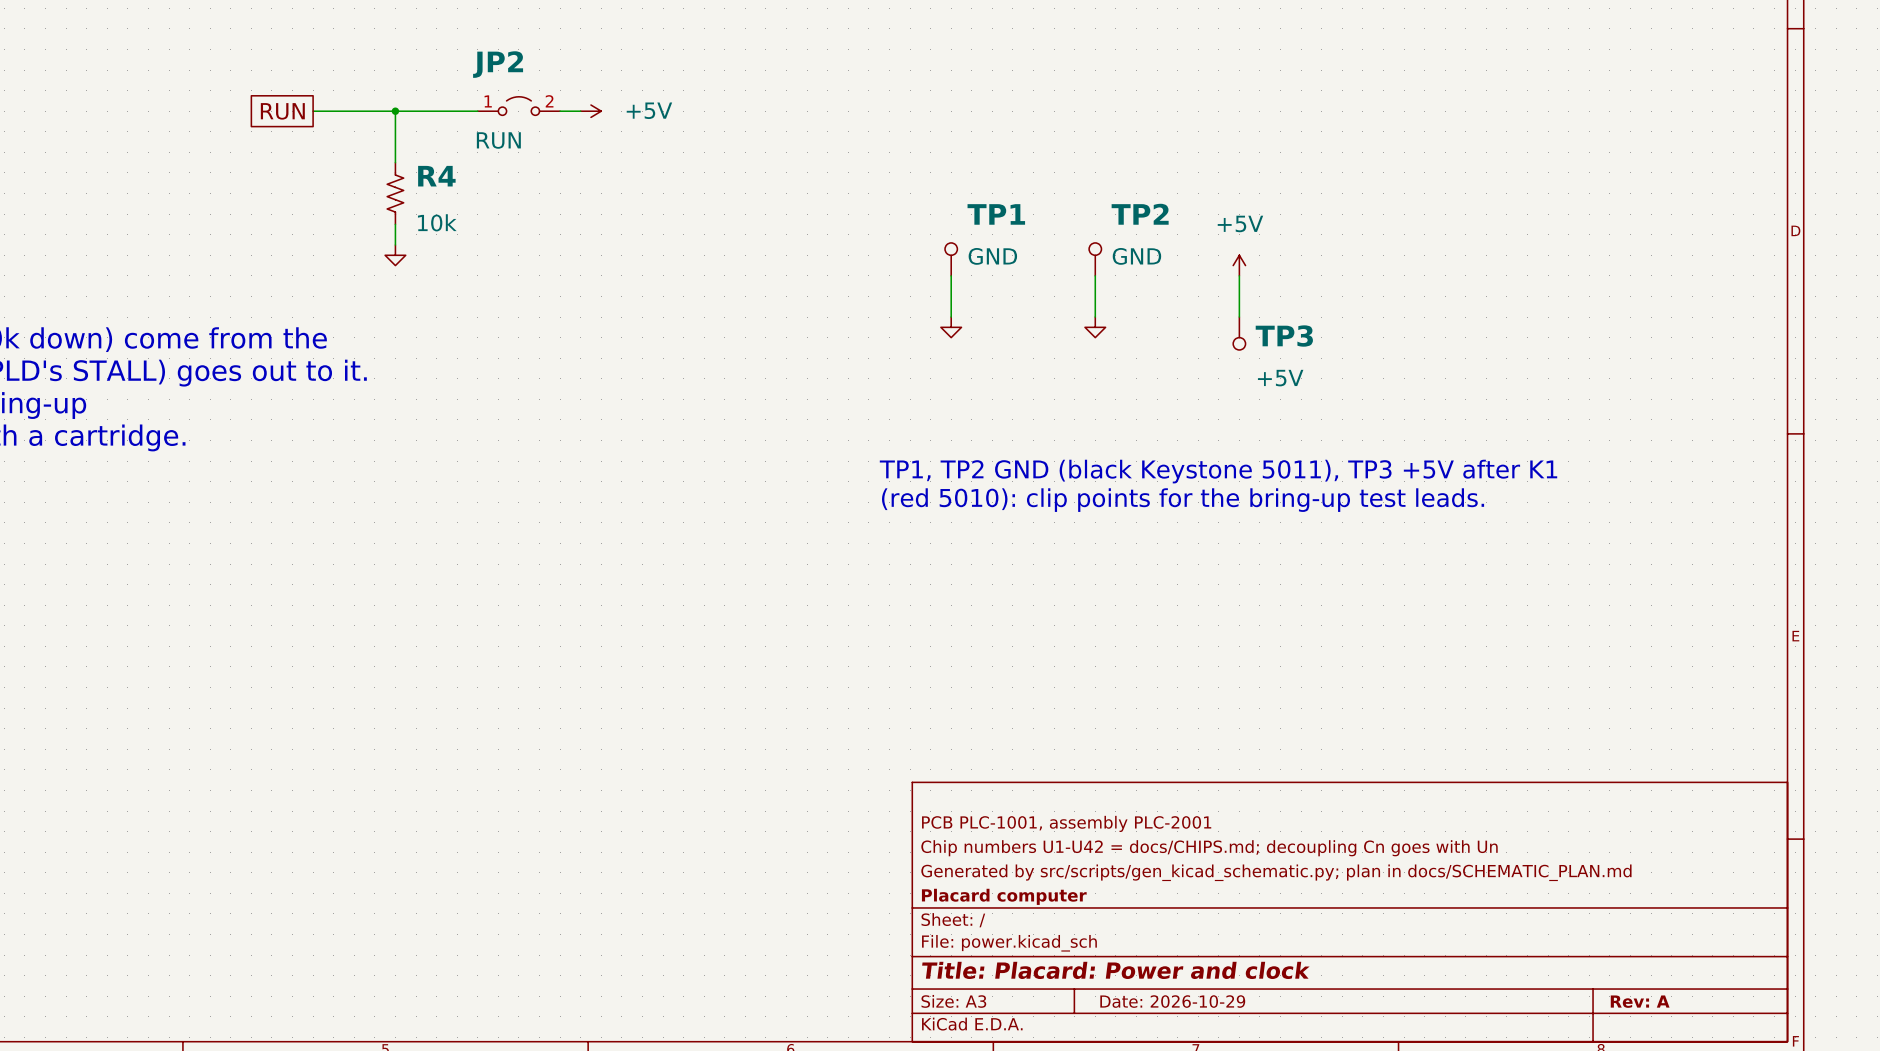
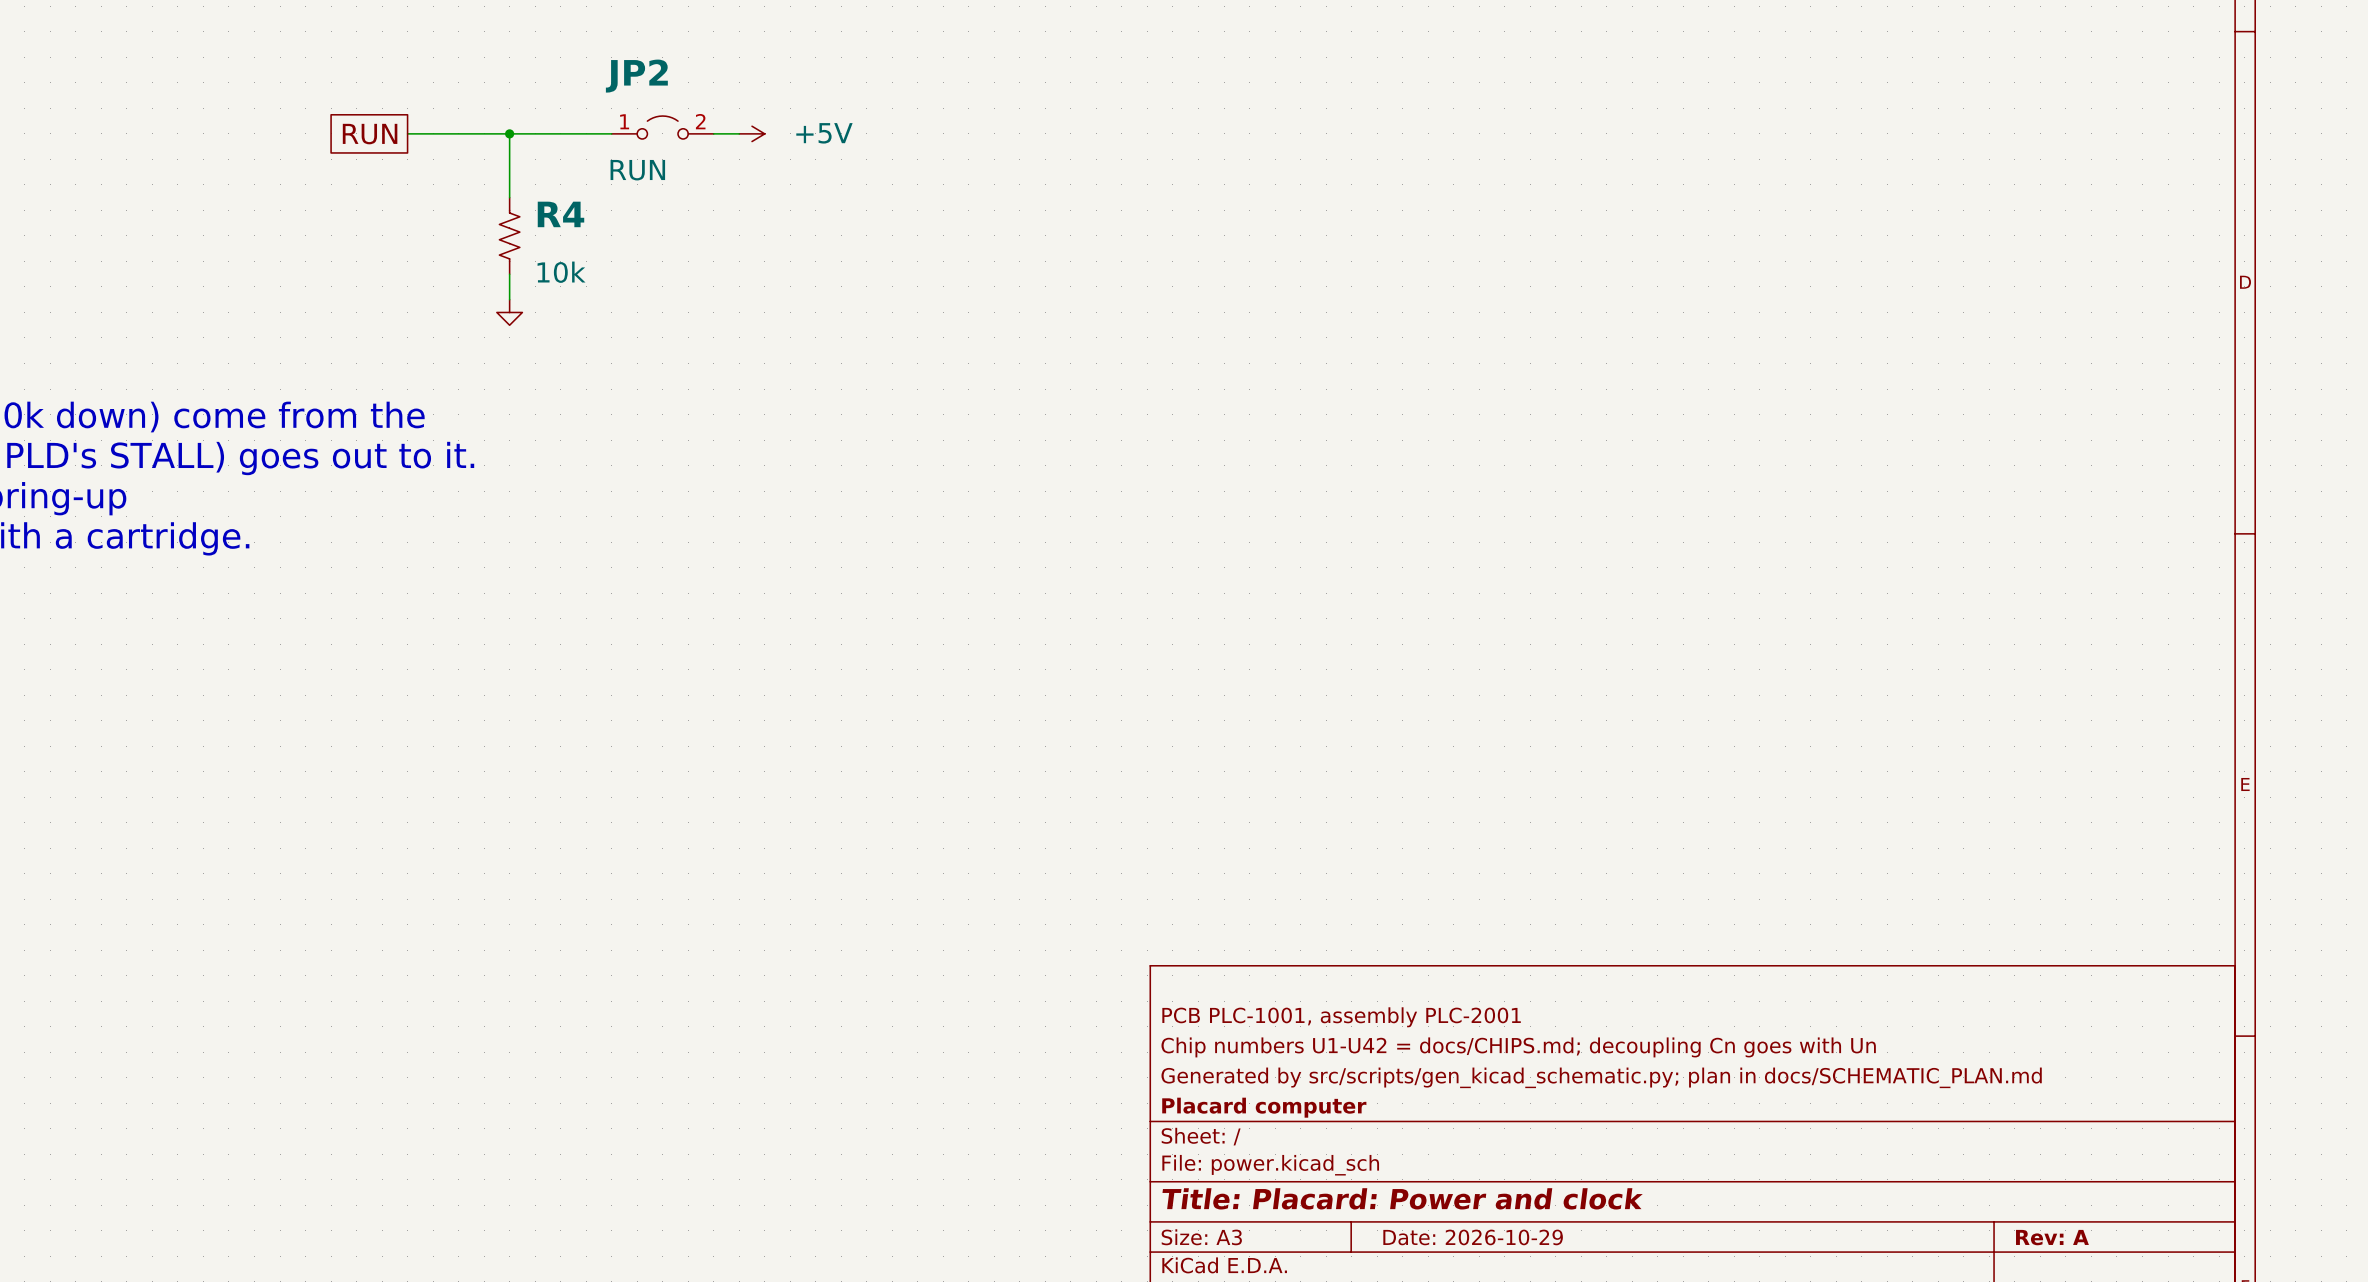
TP1: GND (951, 259) -> none
TP2: GND (1095, 259) -> none
power symbol: +5V (1239, 265) -> none
wire: (951, 275) (951, 317) -> none
wire: (1095, 275) (1095, 317) -> none
wire: (1239, 275) (1239, 317) -> none
power symbol: (951, 327) -> none
power symbol: (1095, 327) -> none
TP3: +5V (1239, 333) -> none
text: TP1, TP2 GND (black Keystone 5011), TP3 +5V after K1 (1218, 471) -> none
text: (red 5010): clip points for the bring-up test leads. (1183, 500) -> none

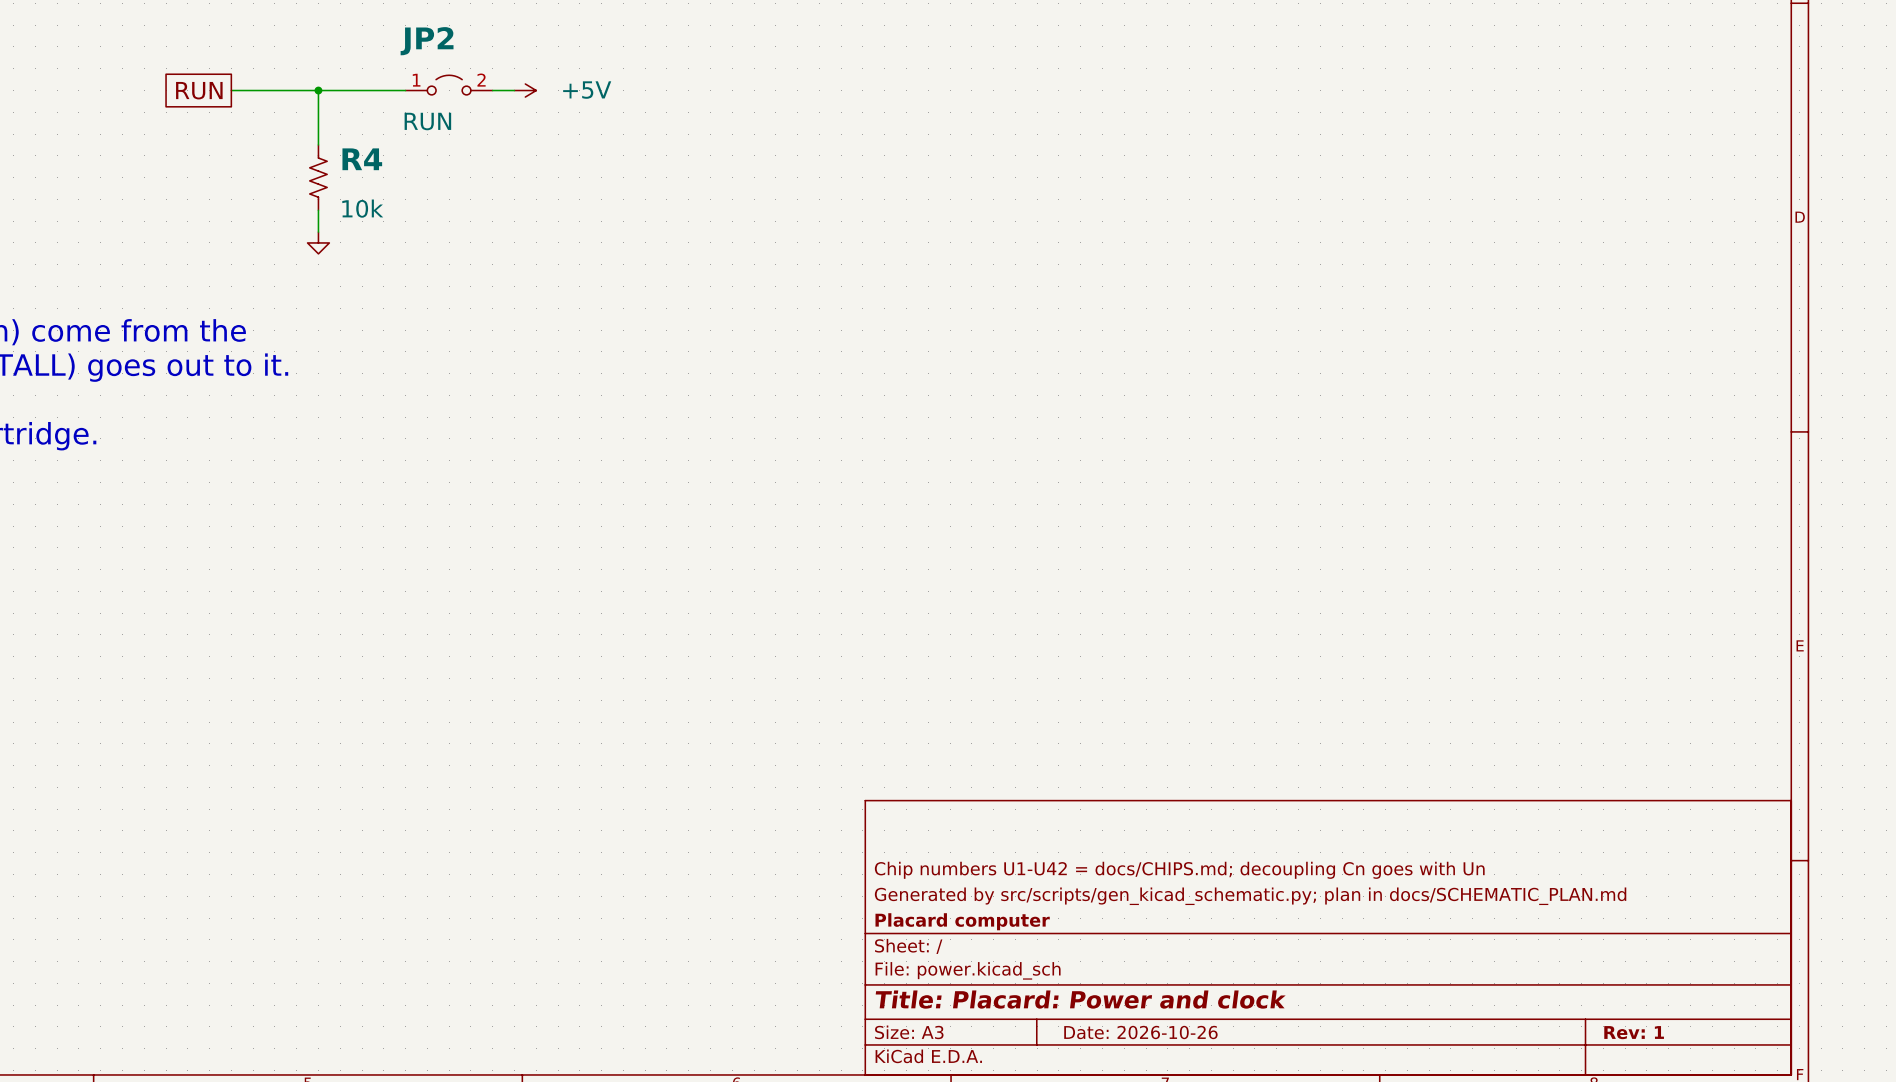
title block: PCB PLC-1001, assembly PLC-2001 (1341, 1017) -> none
title block: Date: 2026-10-29 (1473, 1237) -> Date: 2026-10-26 (1140, 1032)
title block: Rev: A (2052, 1237) -> Rev: 1 (1634, 1032)

